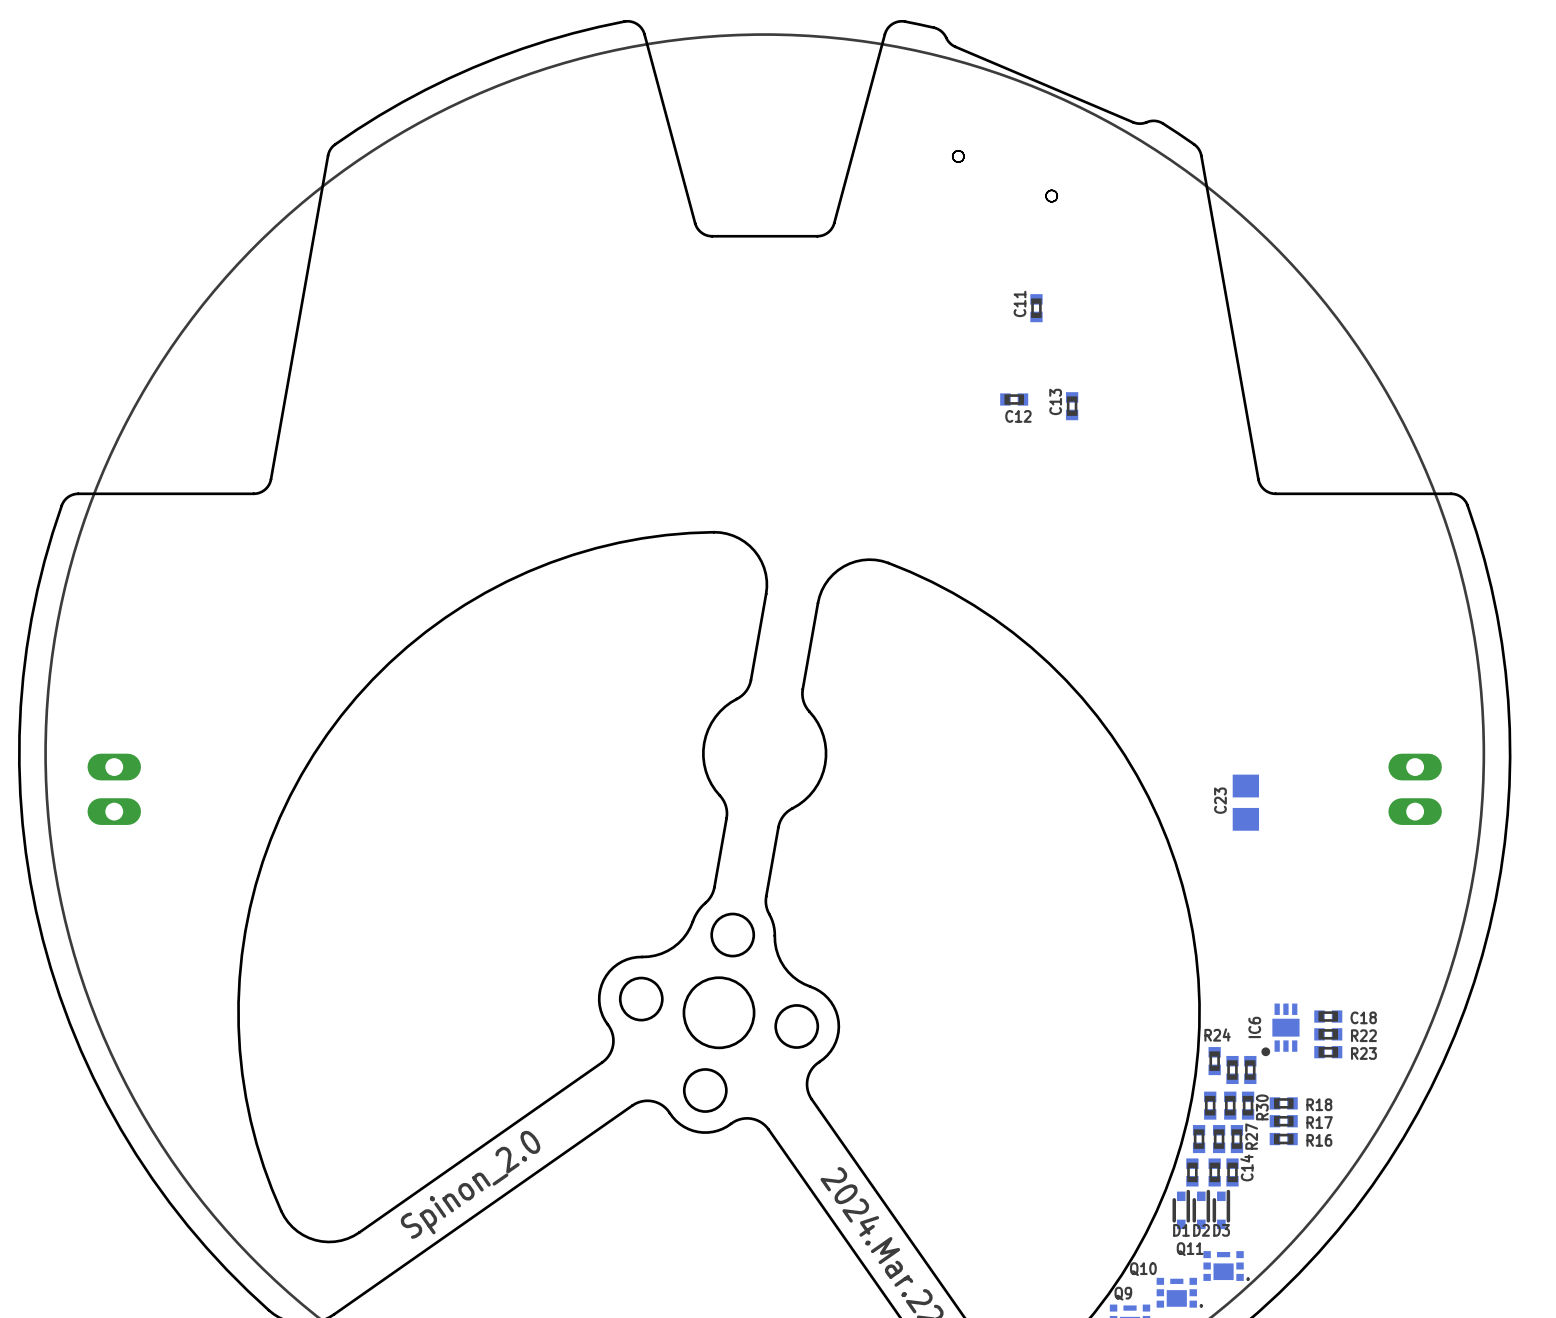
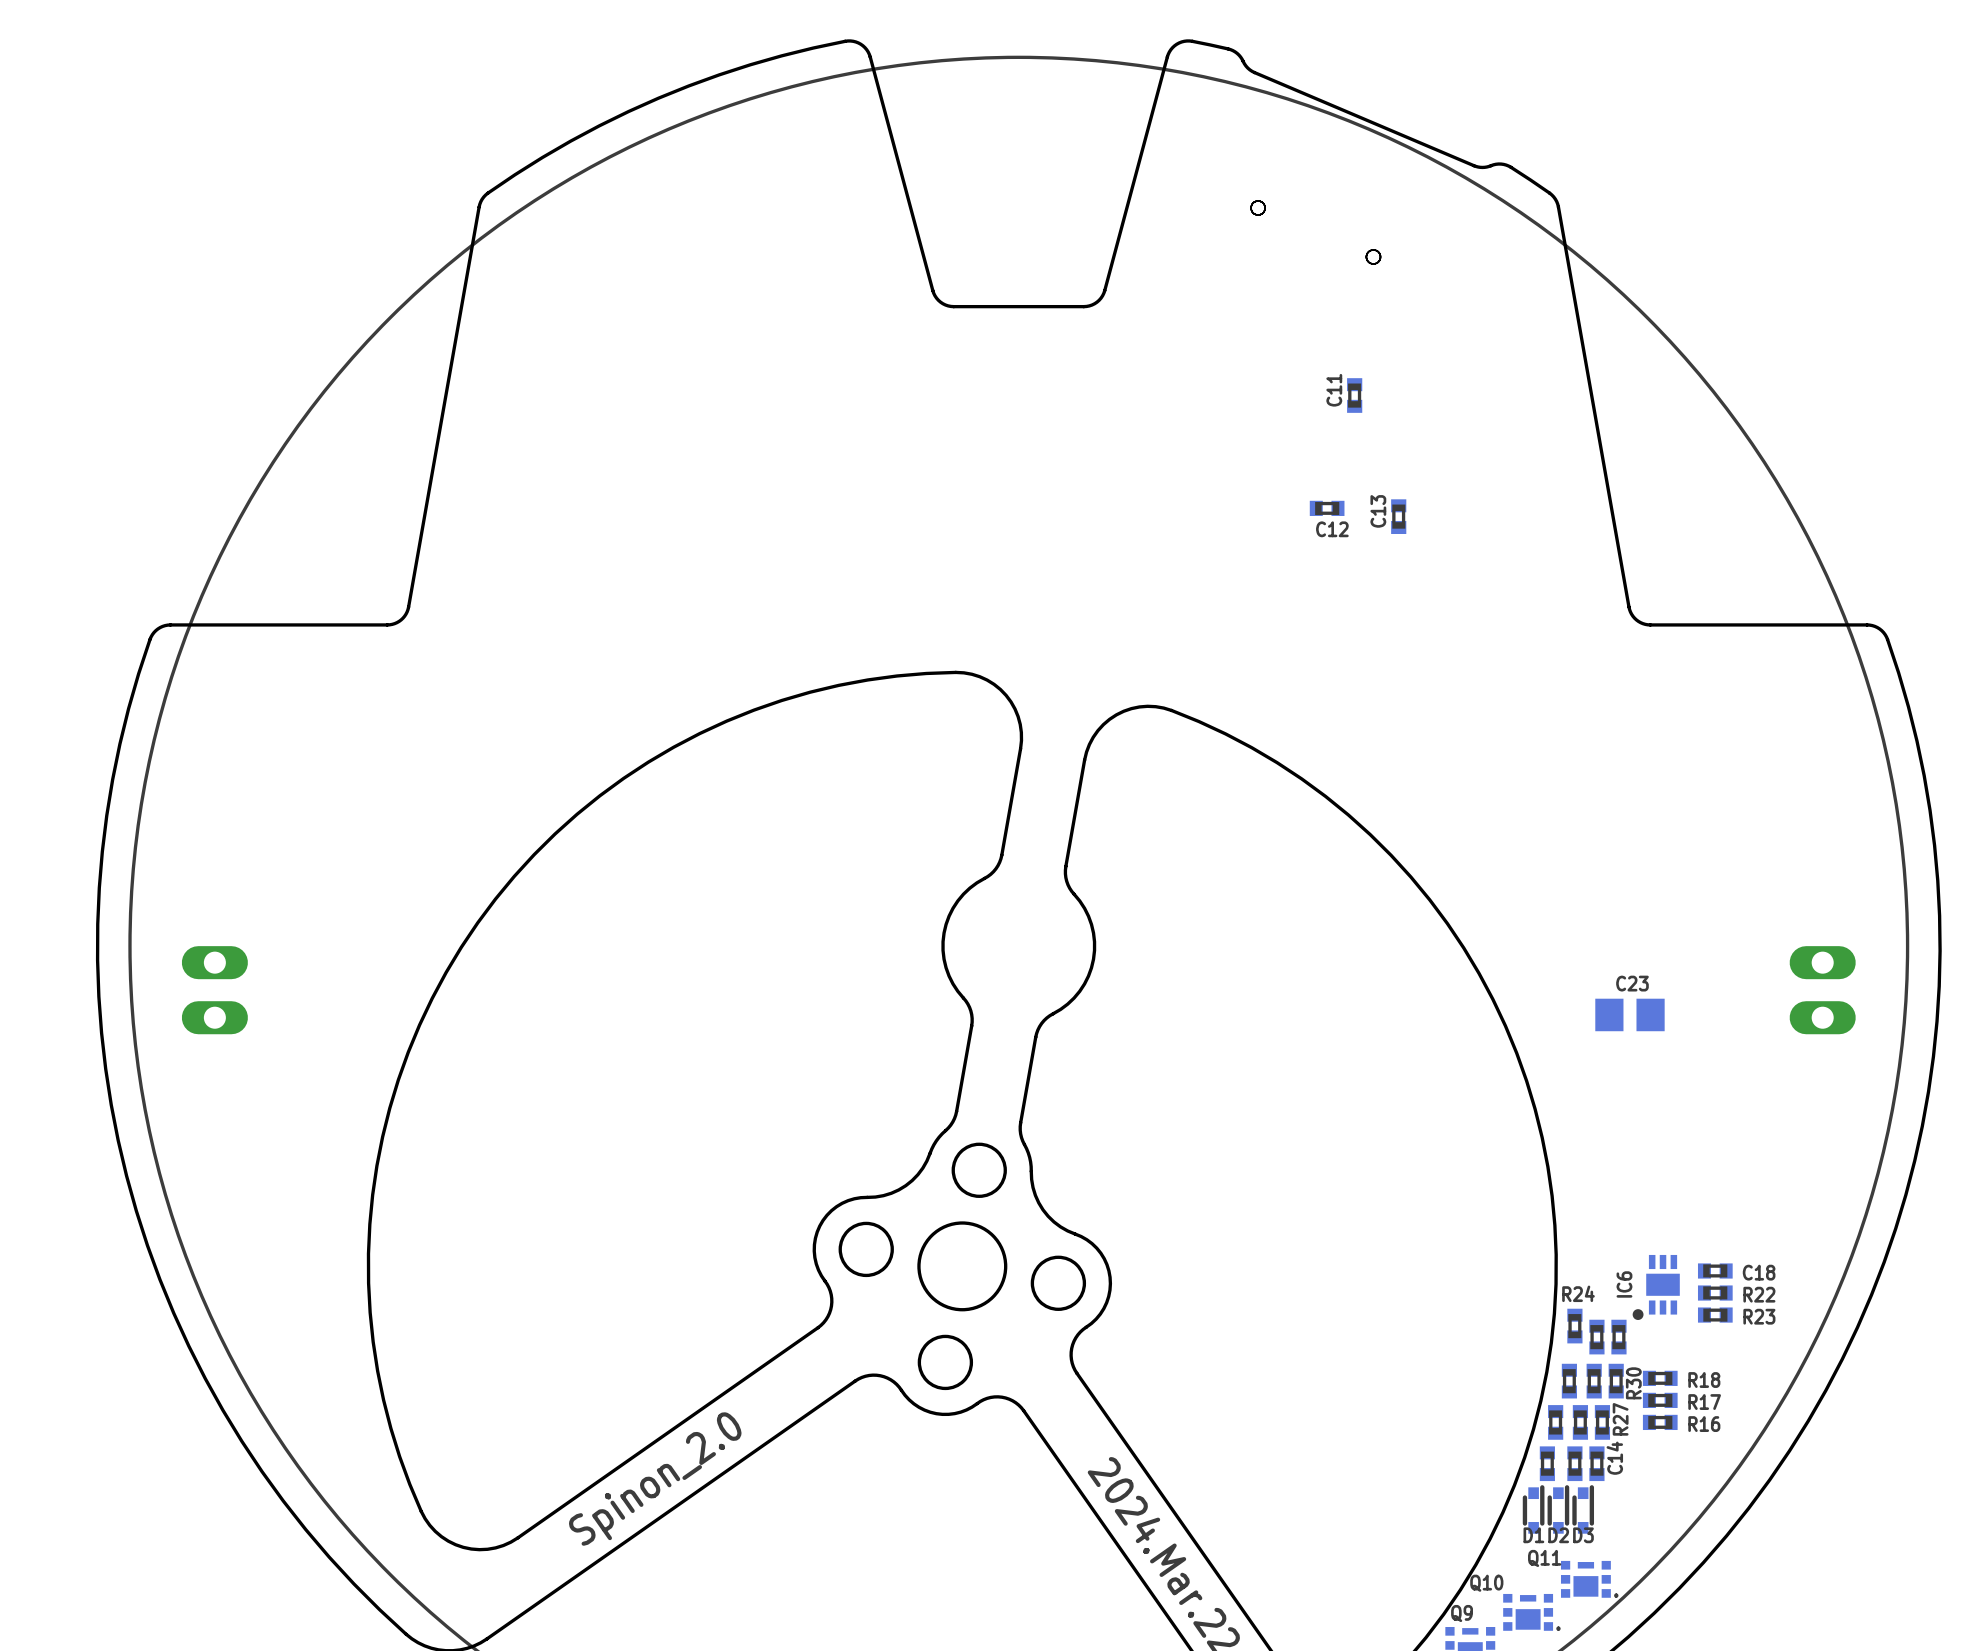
C23 rotation: 0° (1245, 802) -> 90° clockwise (1629, 1014)

